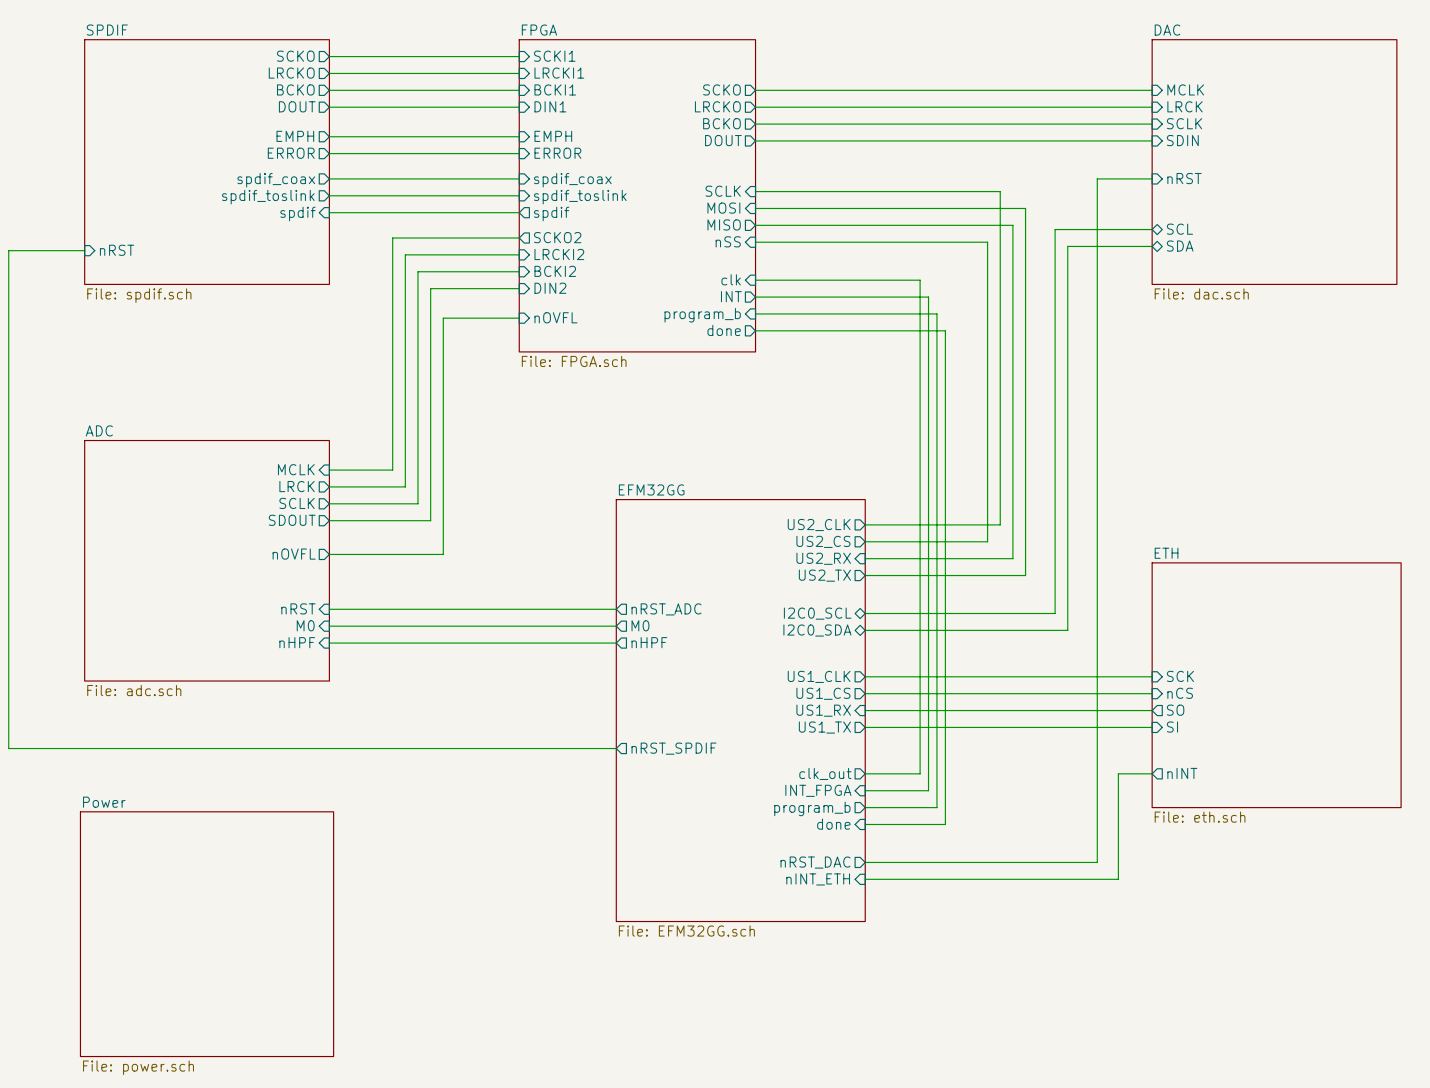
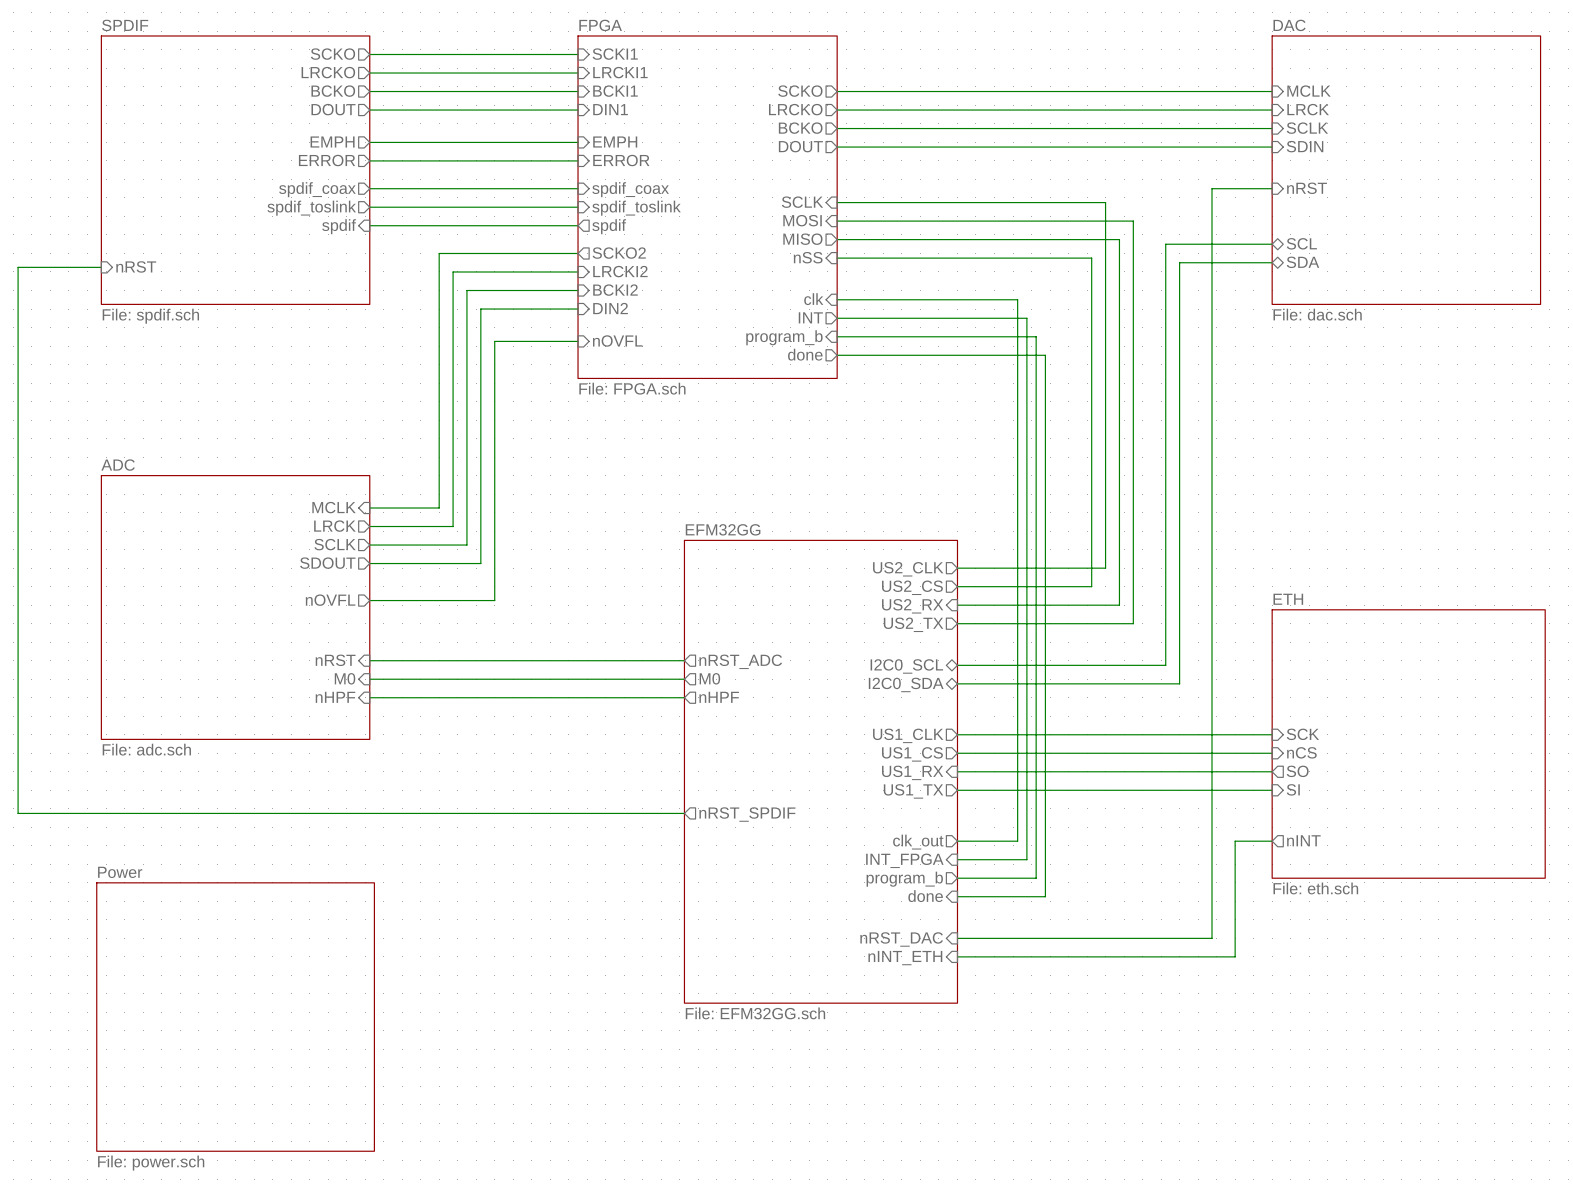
sheet pin shape: output (815, 862) -> input (901, 939)

